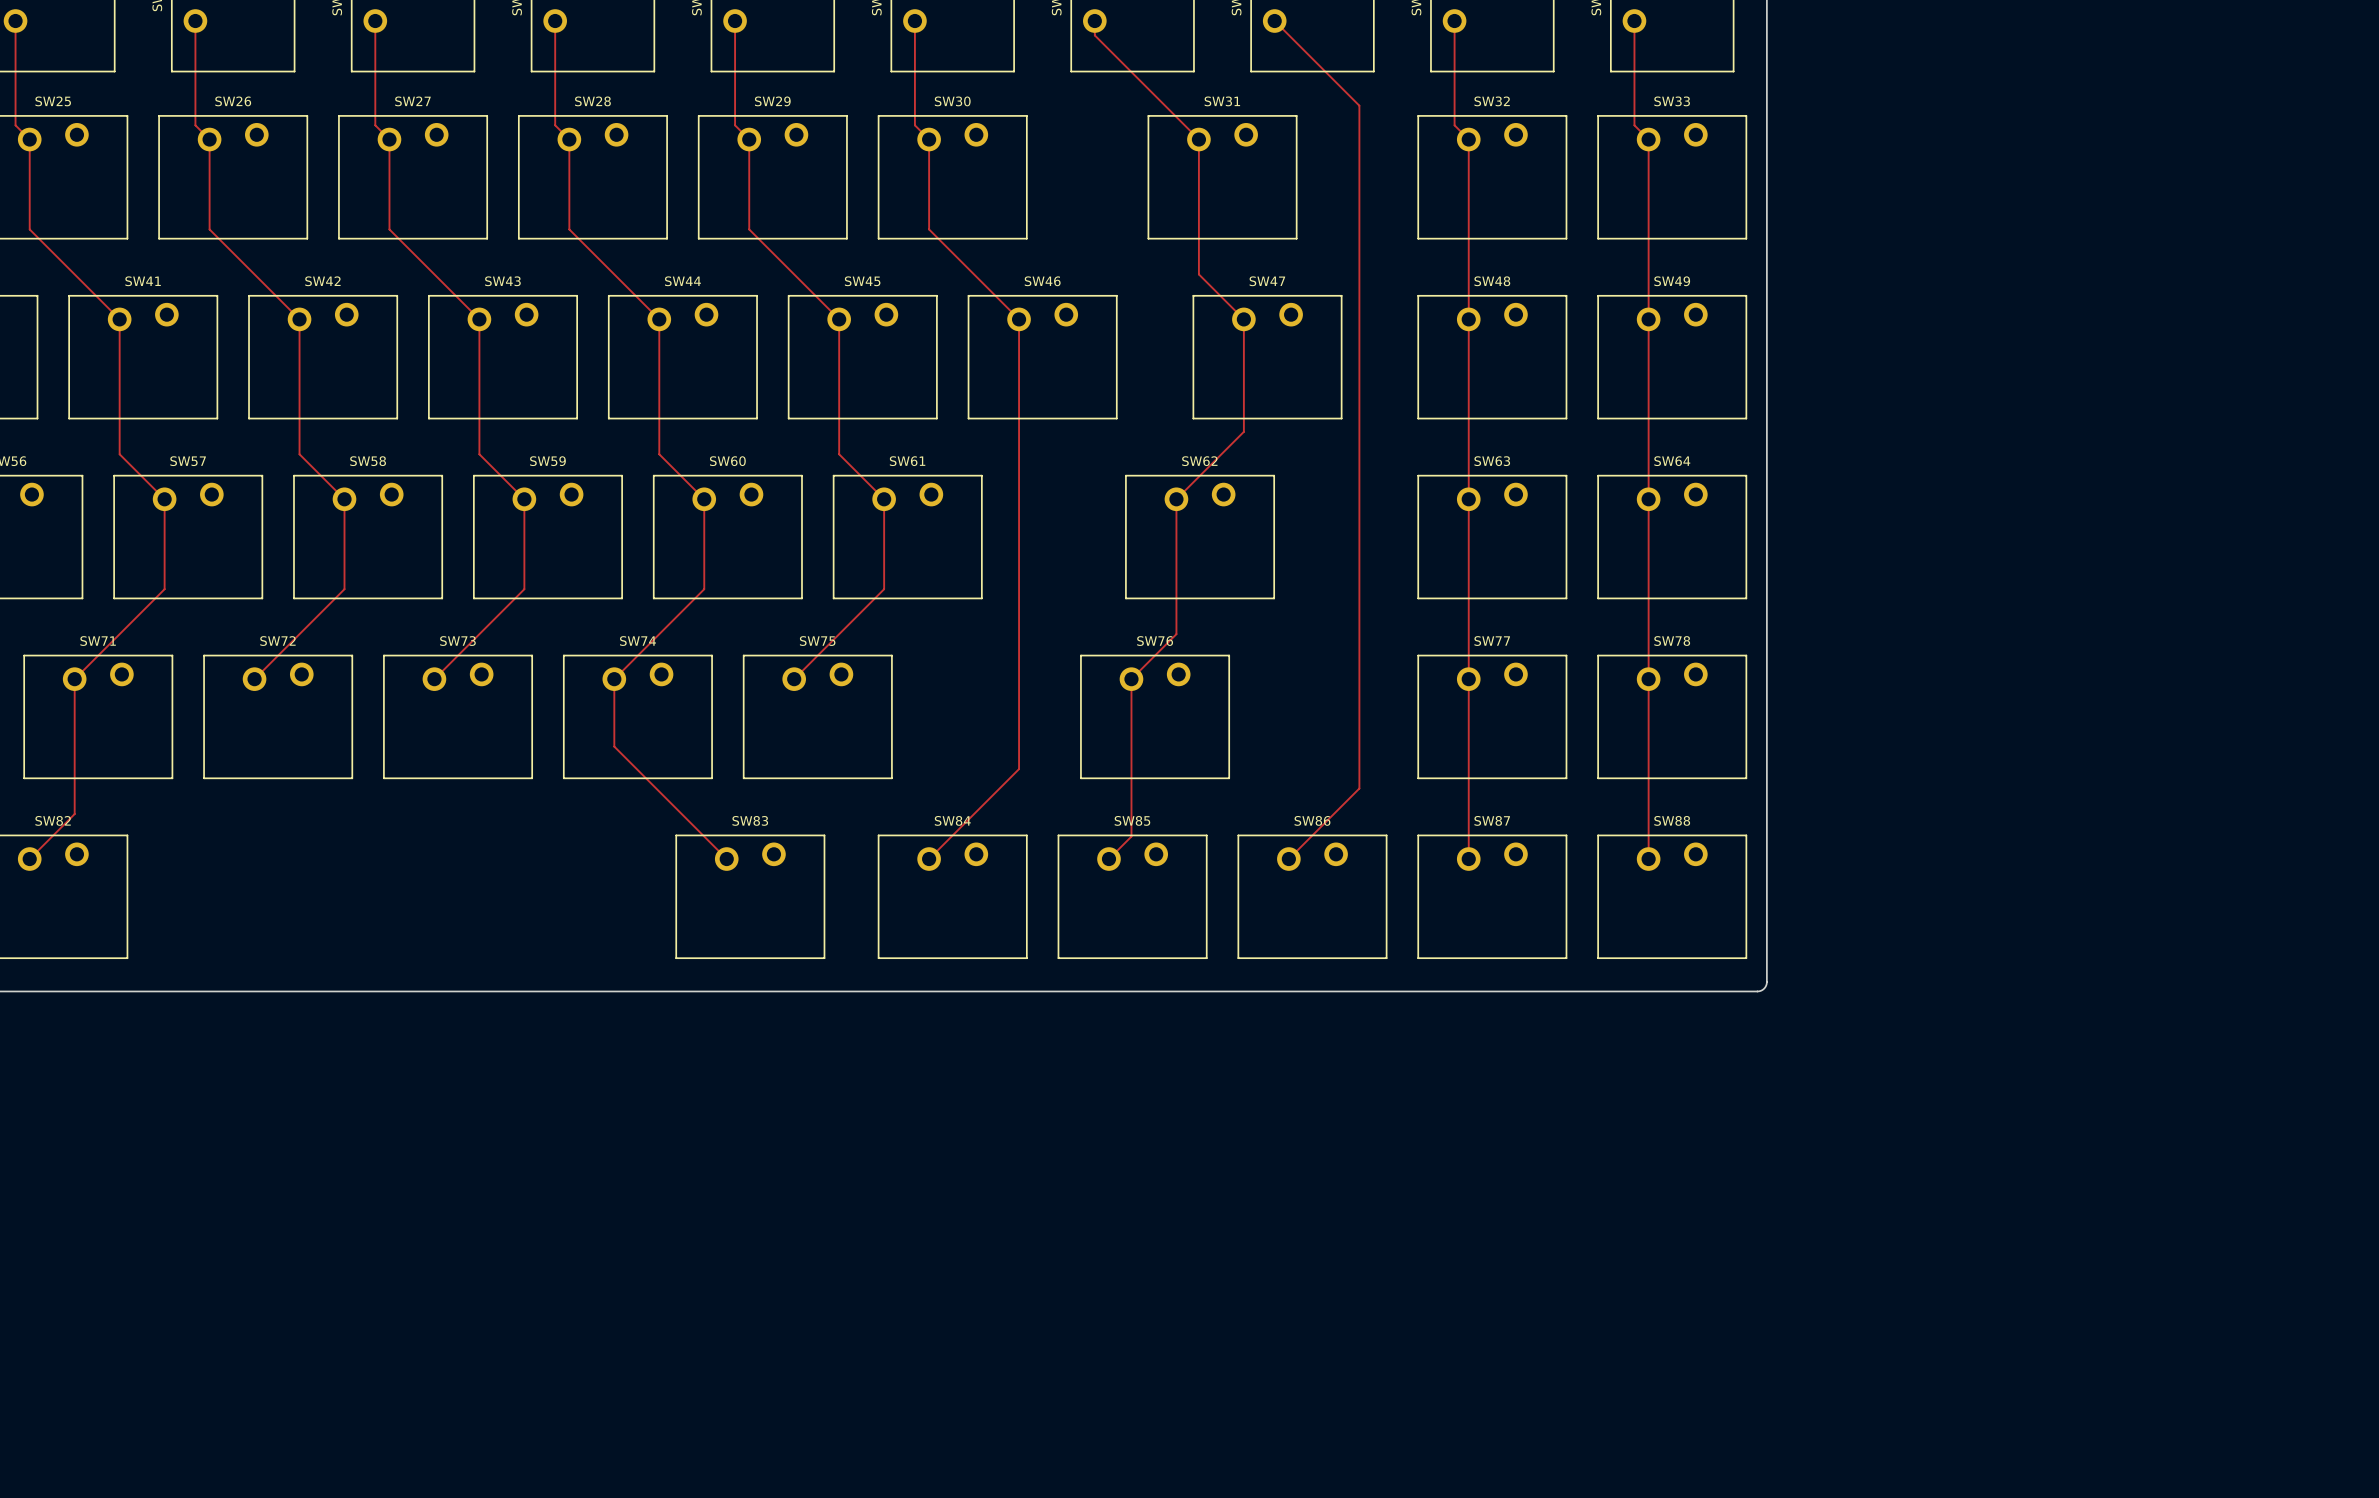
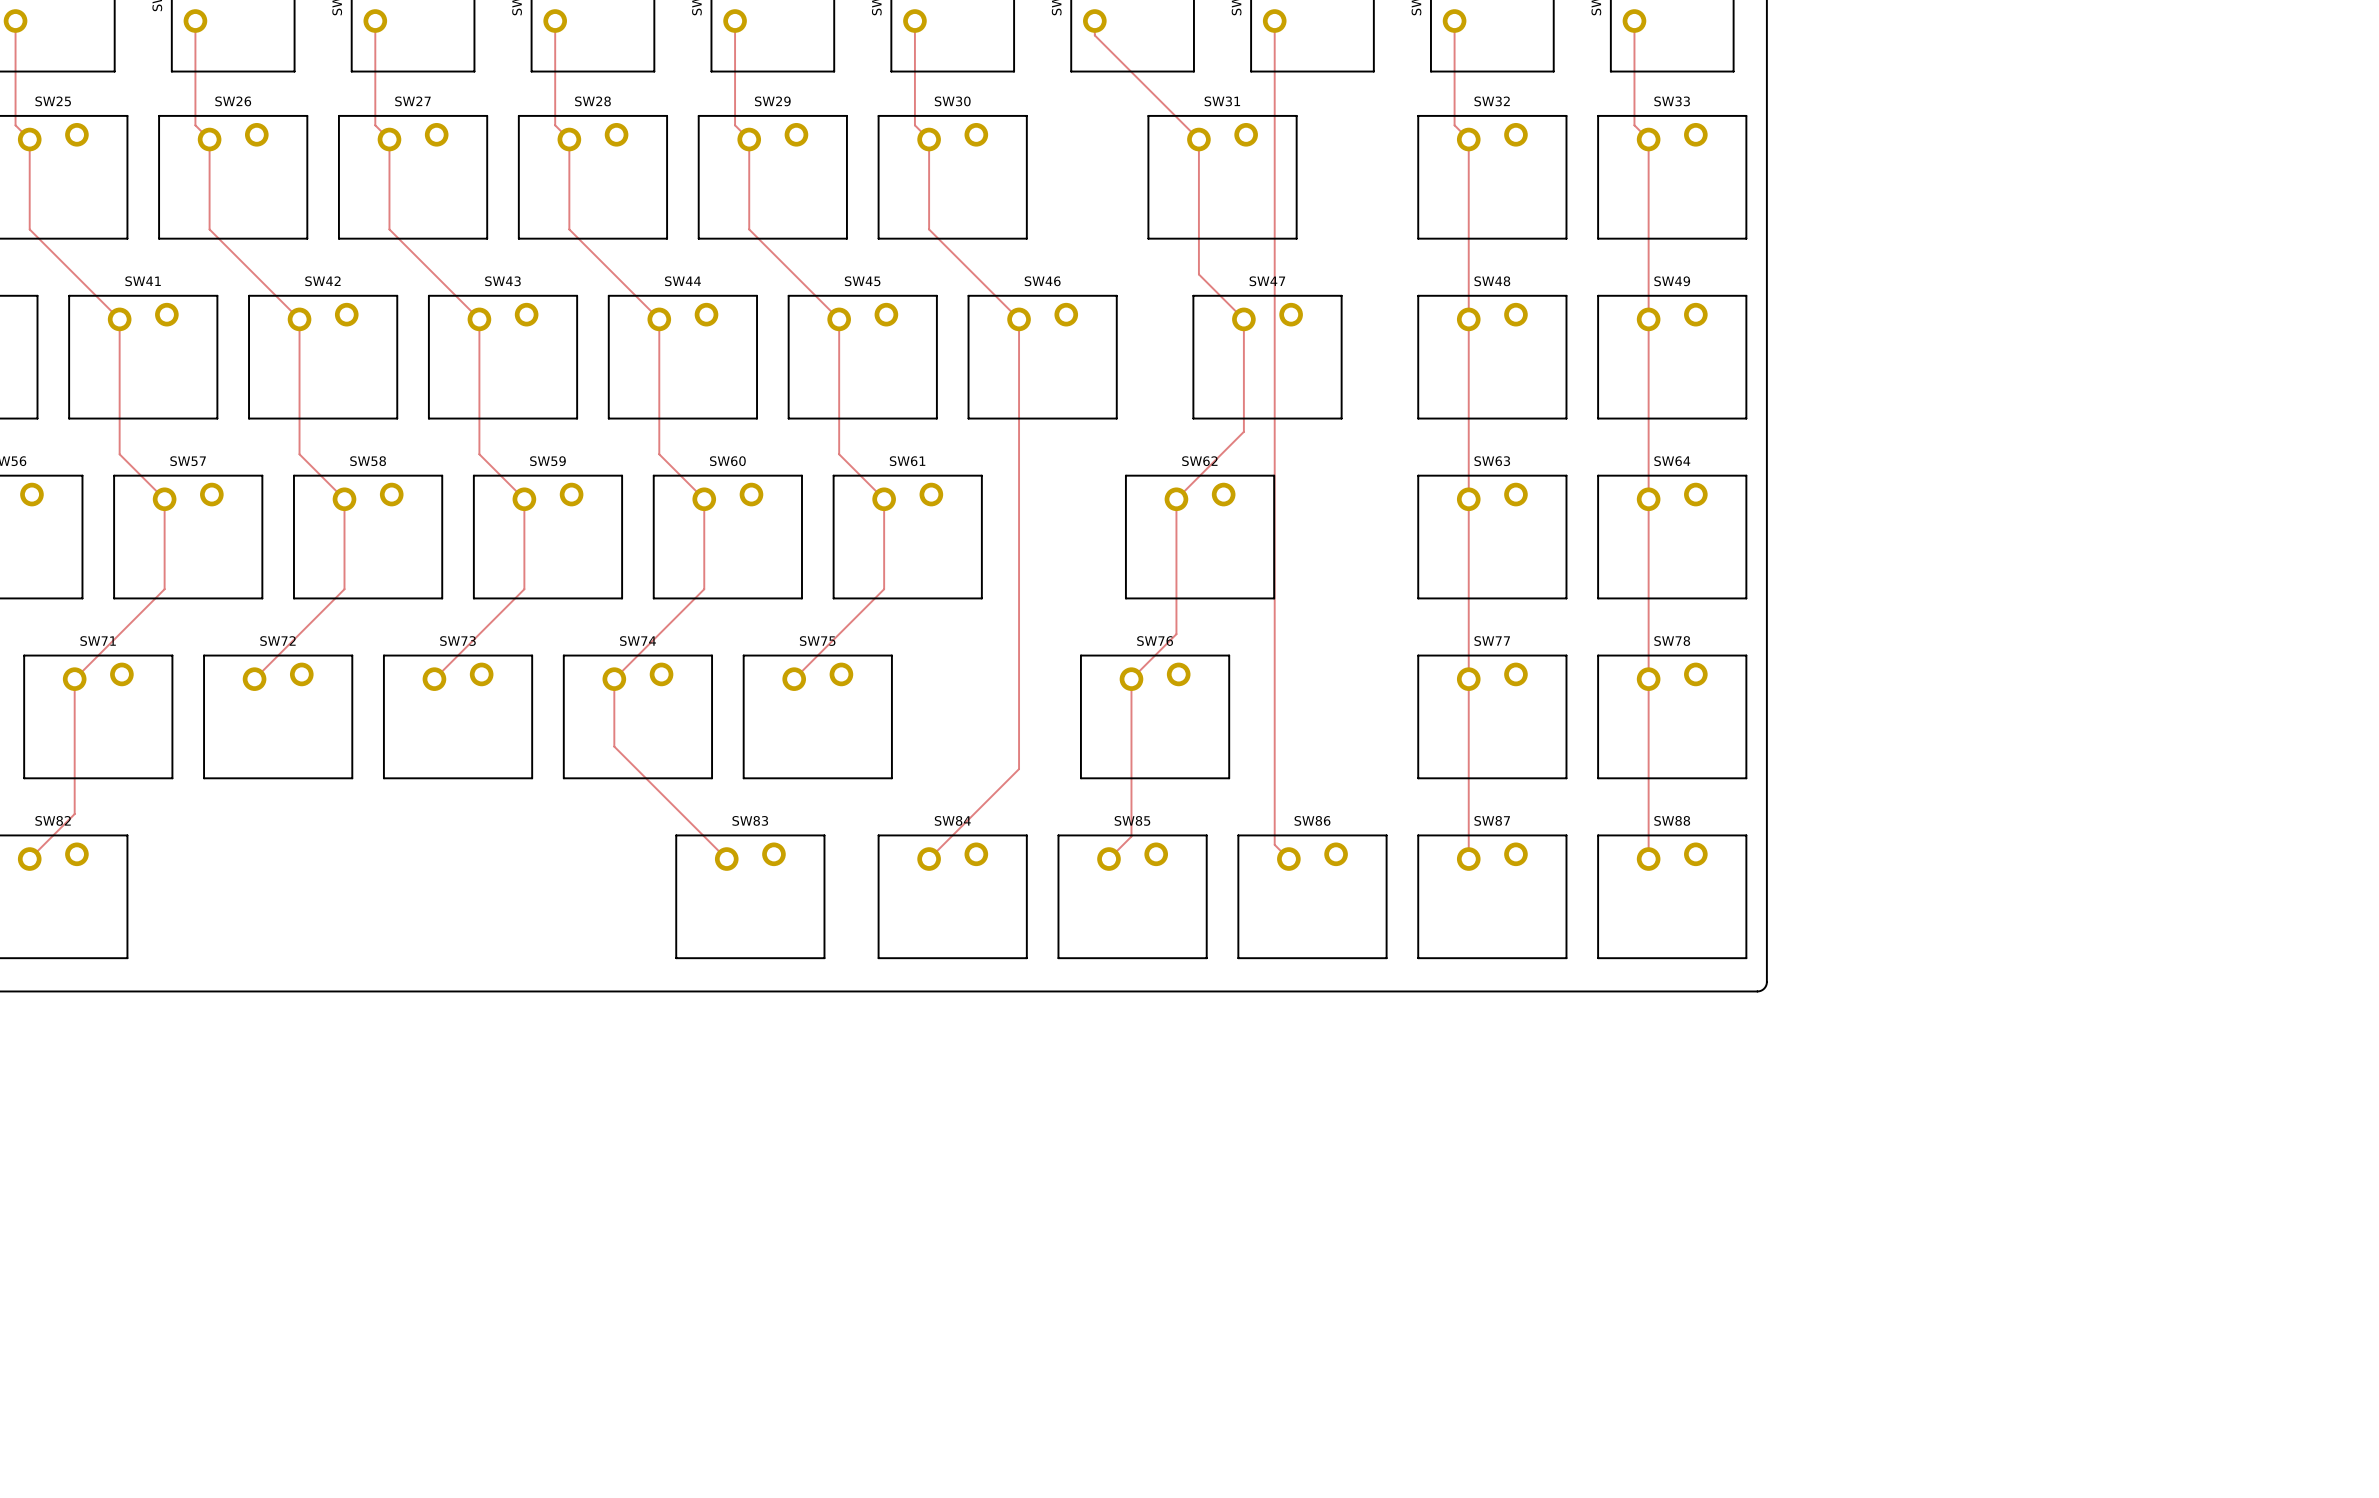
track: (1274, 21) (1359, 105) (1359, 788) (1288, 859) -> (1274, 21) (1274, 844) (1288, 859)

